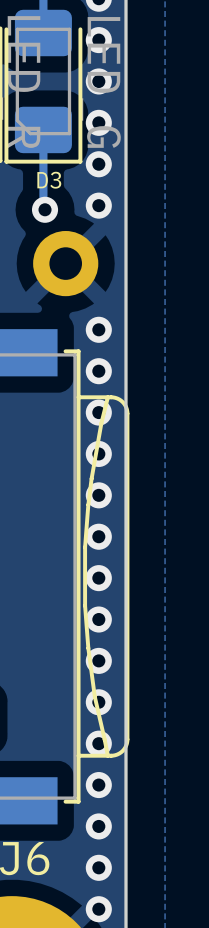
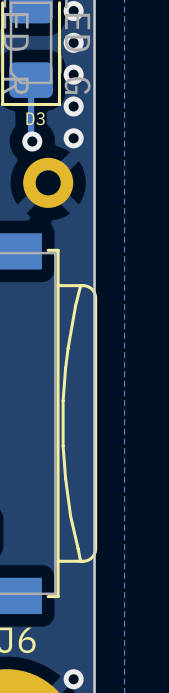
via: (98, 329) -> none
via: (98, 371) -> none
via: (98, 412) -> none
via: (98, 453) -> none
via: (98, 495) -> none
via: (98, 536) -> none
via: (98, 578) -> none
via: (98, 619) -> none
via: (98, 660) -> none
via: (98, 702) -> none
via: (98, 743) -> none
via: (98, 785) -> none
via: (98, 826) -> none
via: (98, 867) -> none

